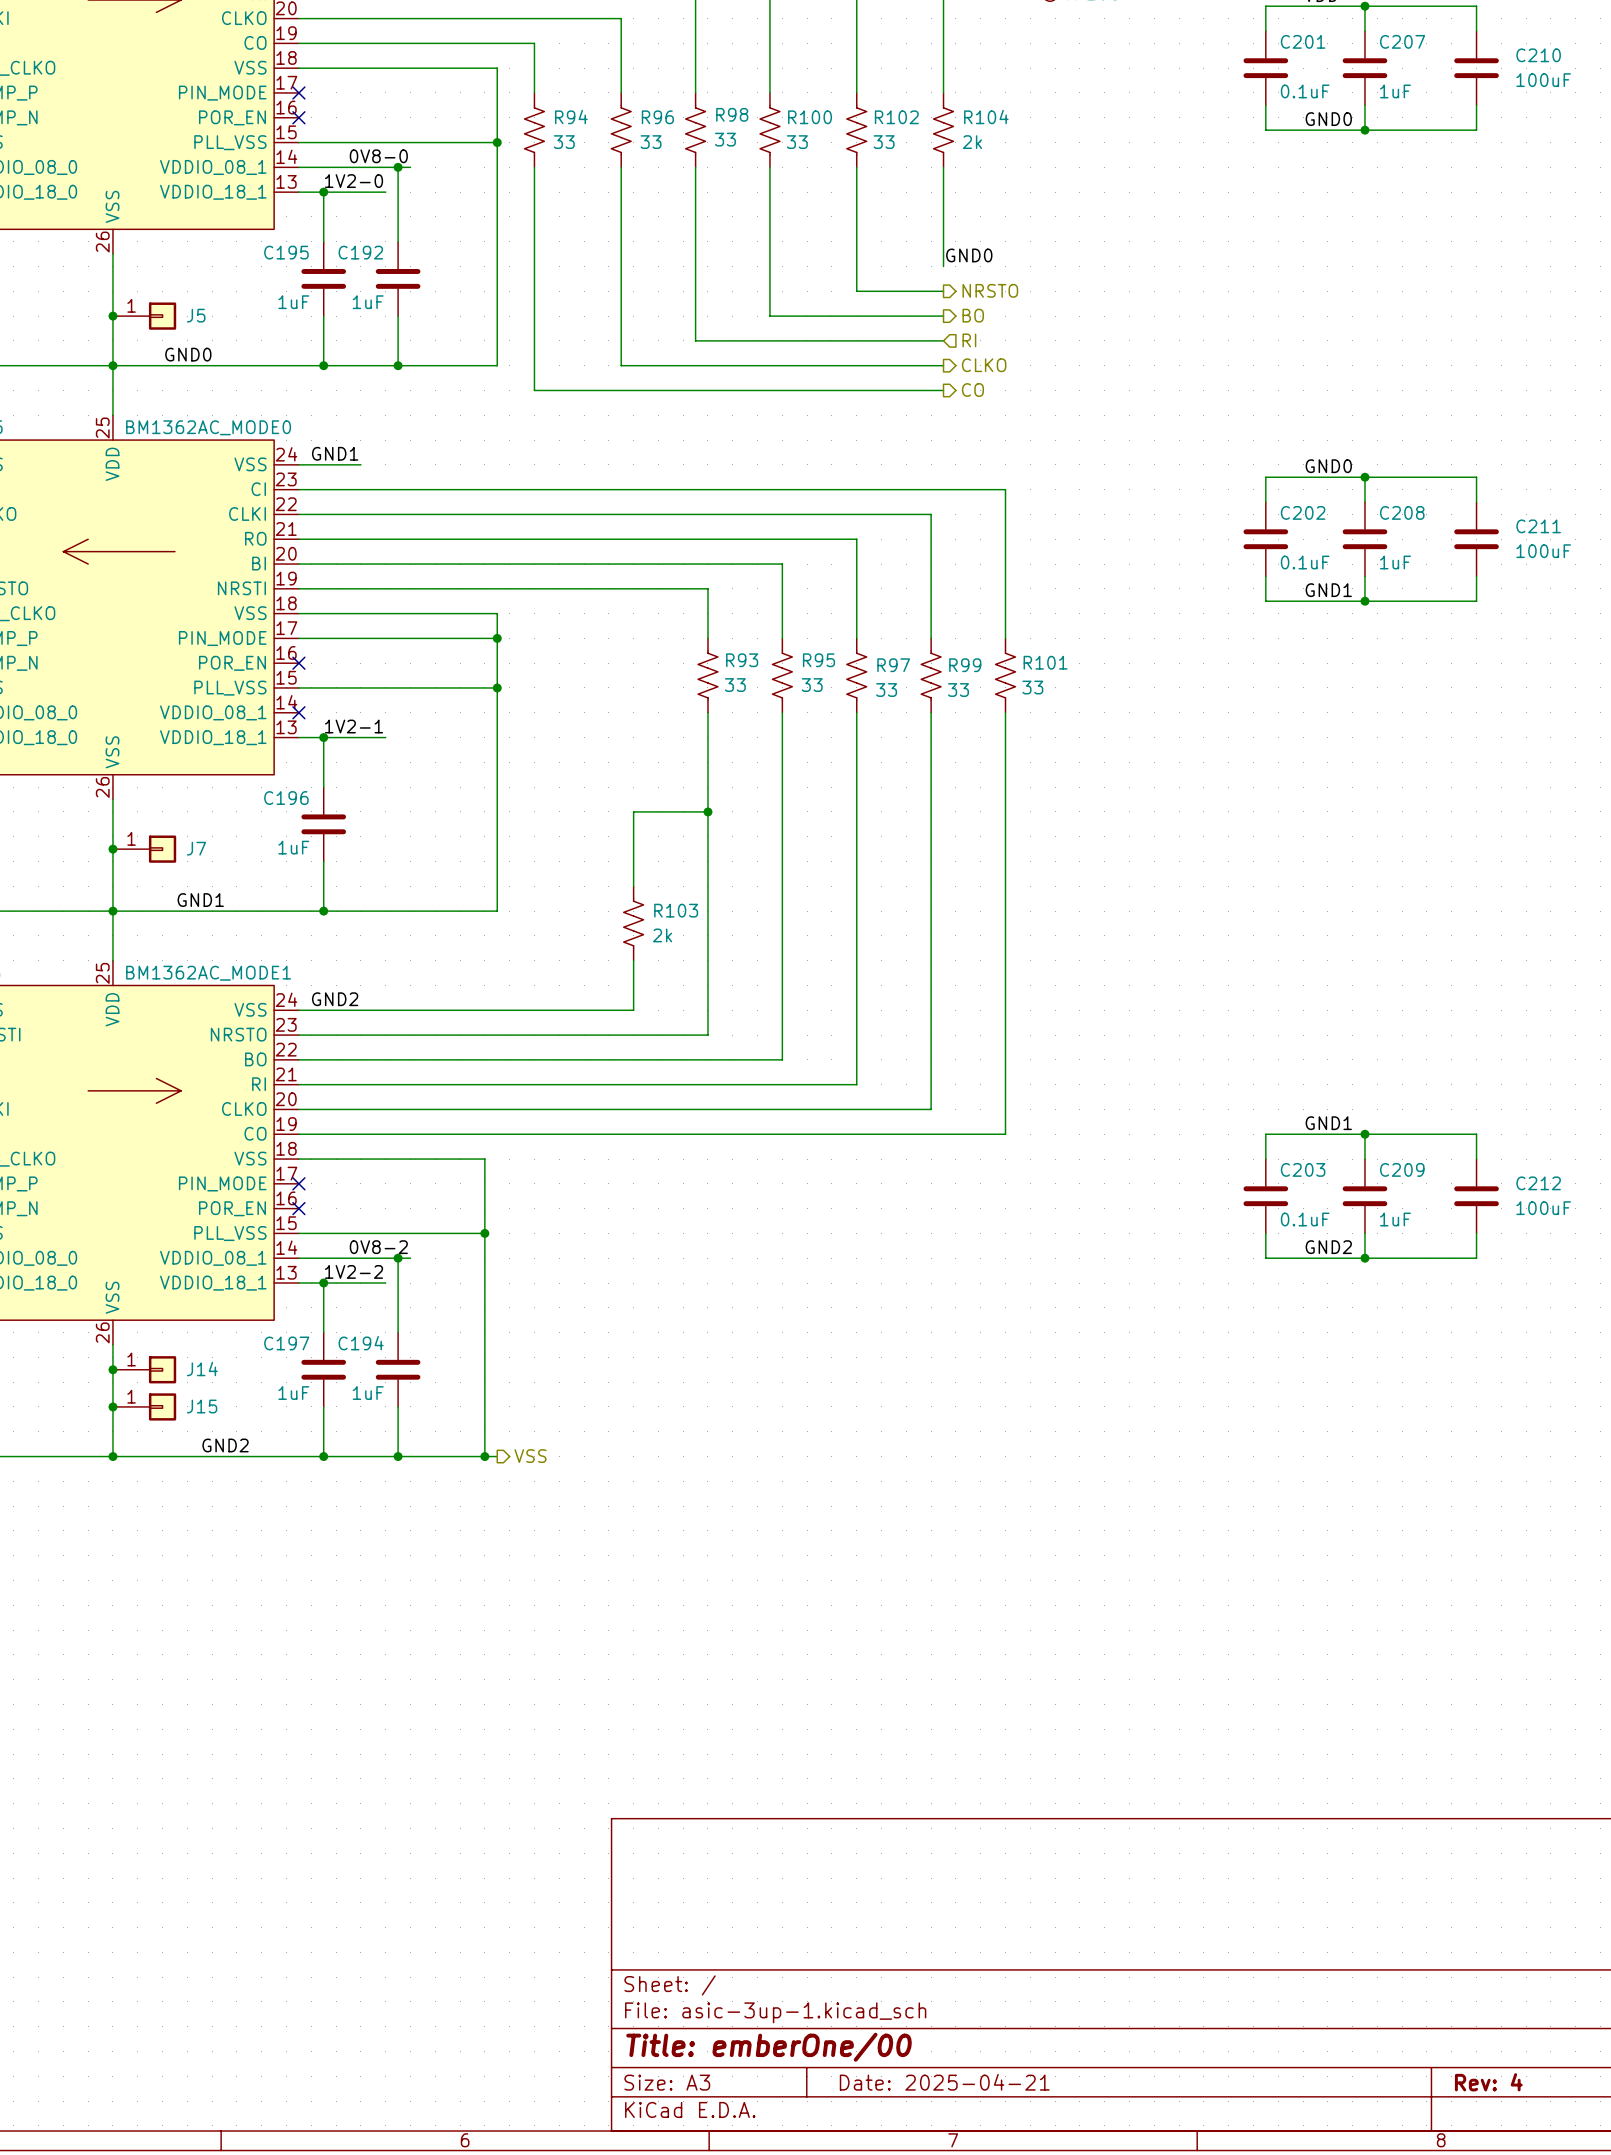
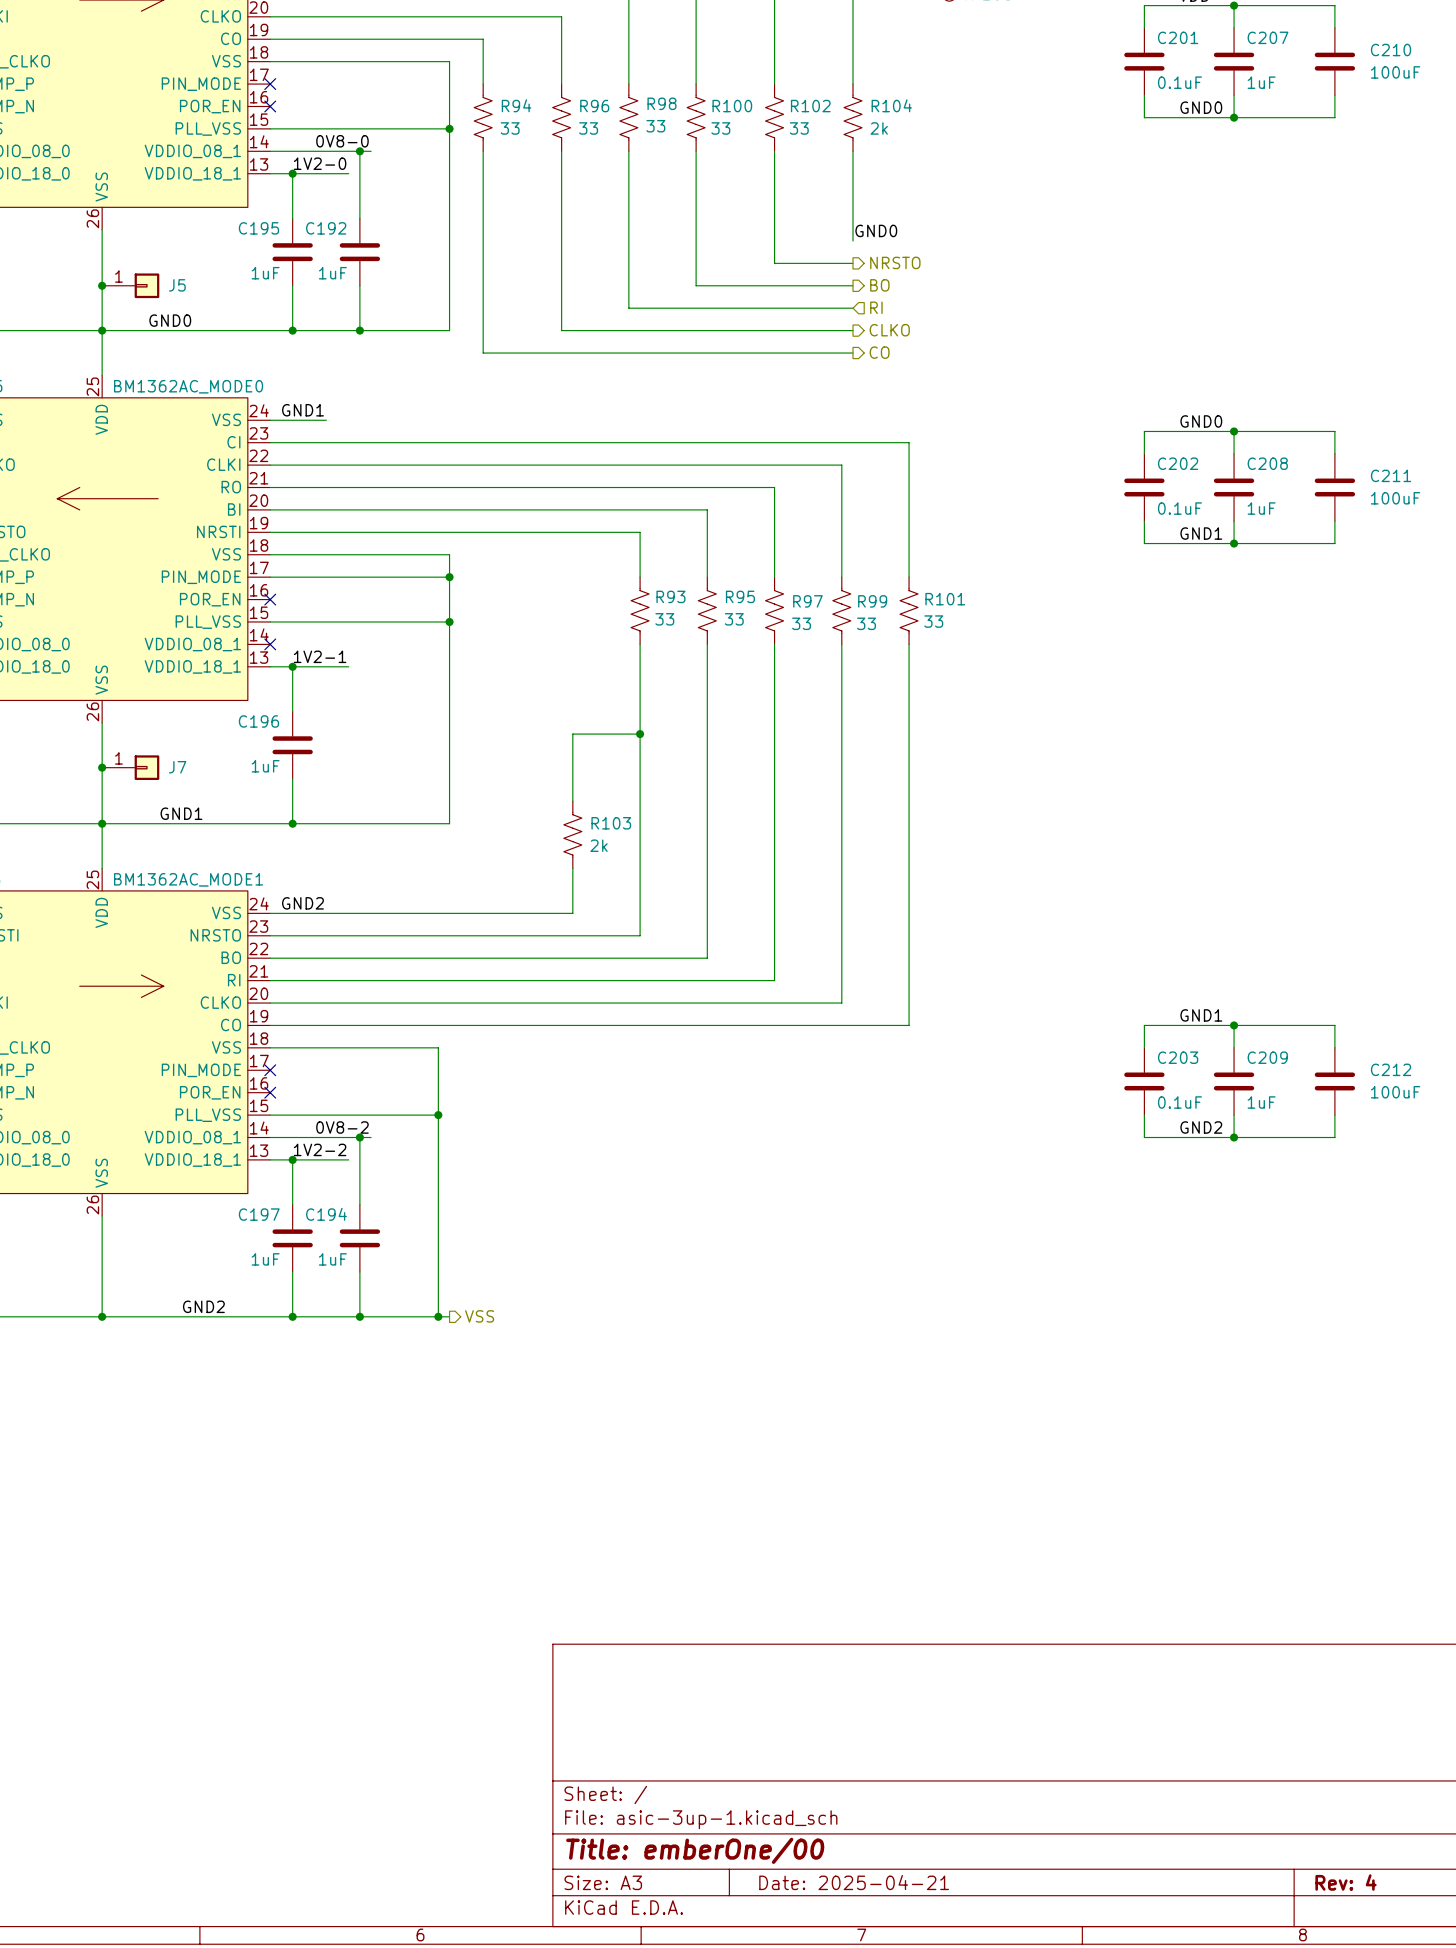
junction: (112, 1369) -> none
J14: (144, 1369) -> none
junction: (112, 1406) -> none
J15: (144, 1406) -> none

